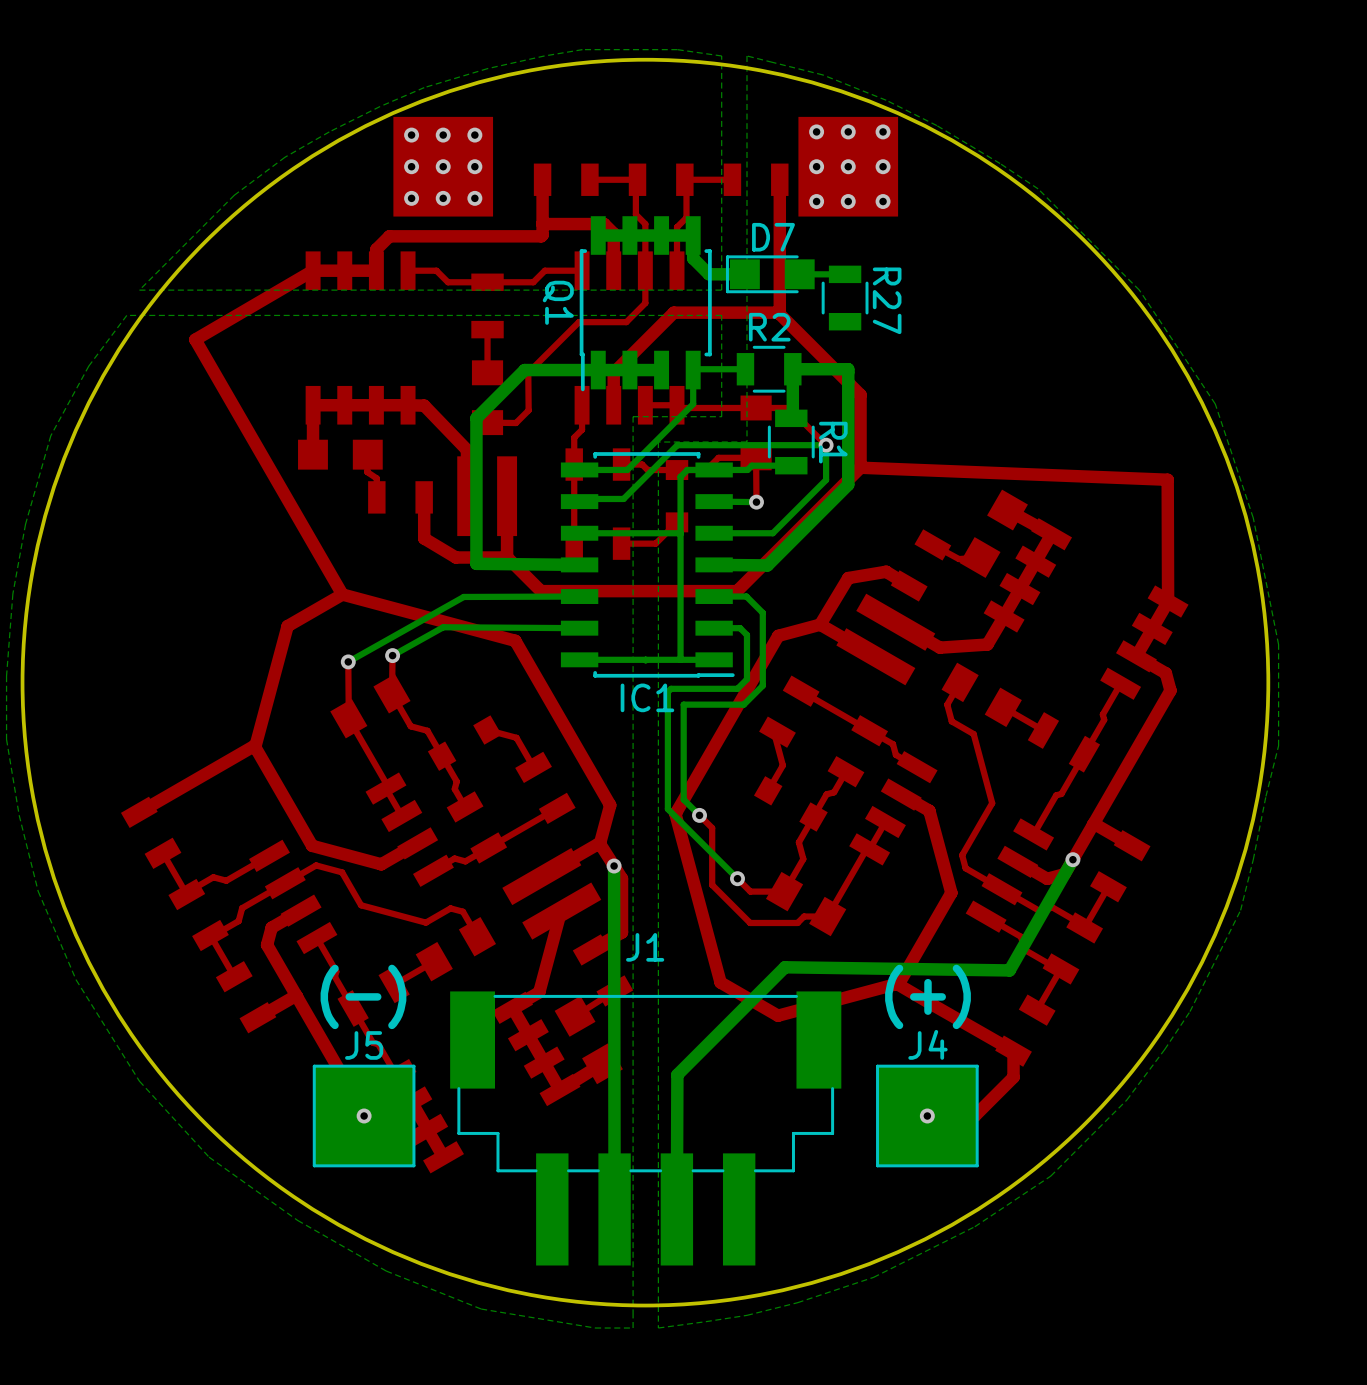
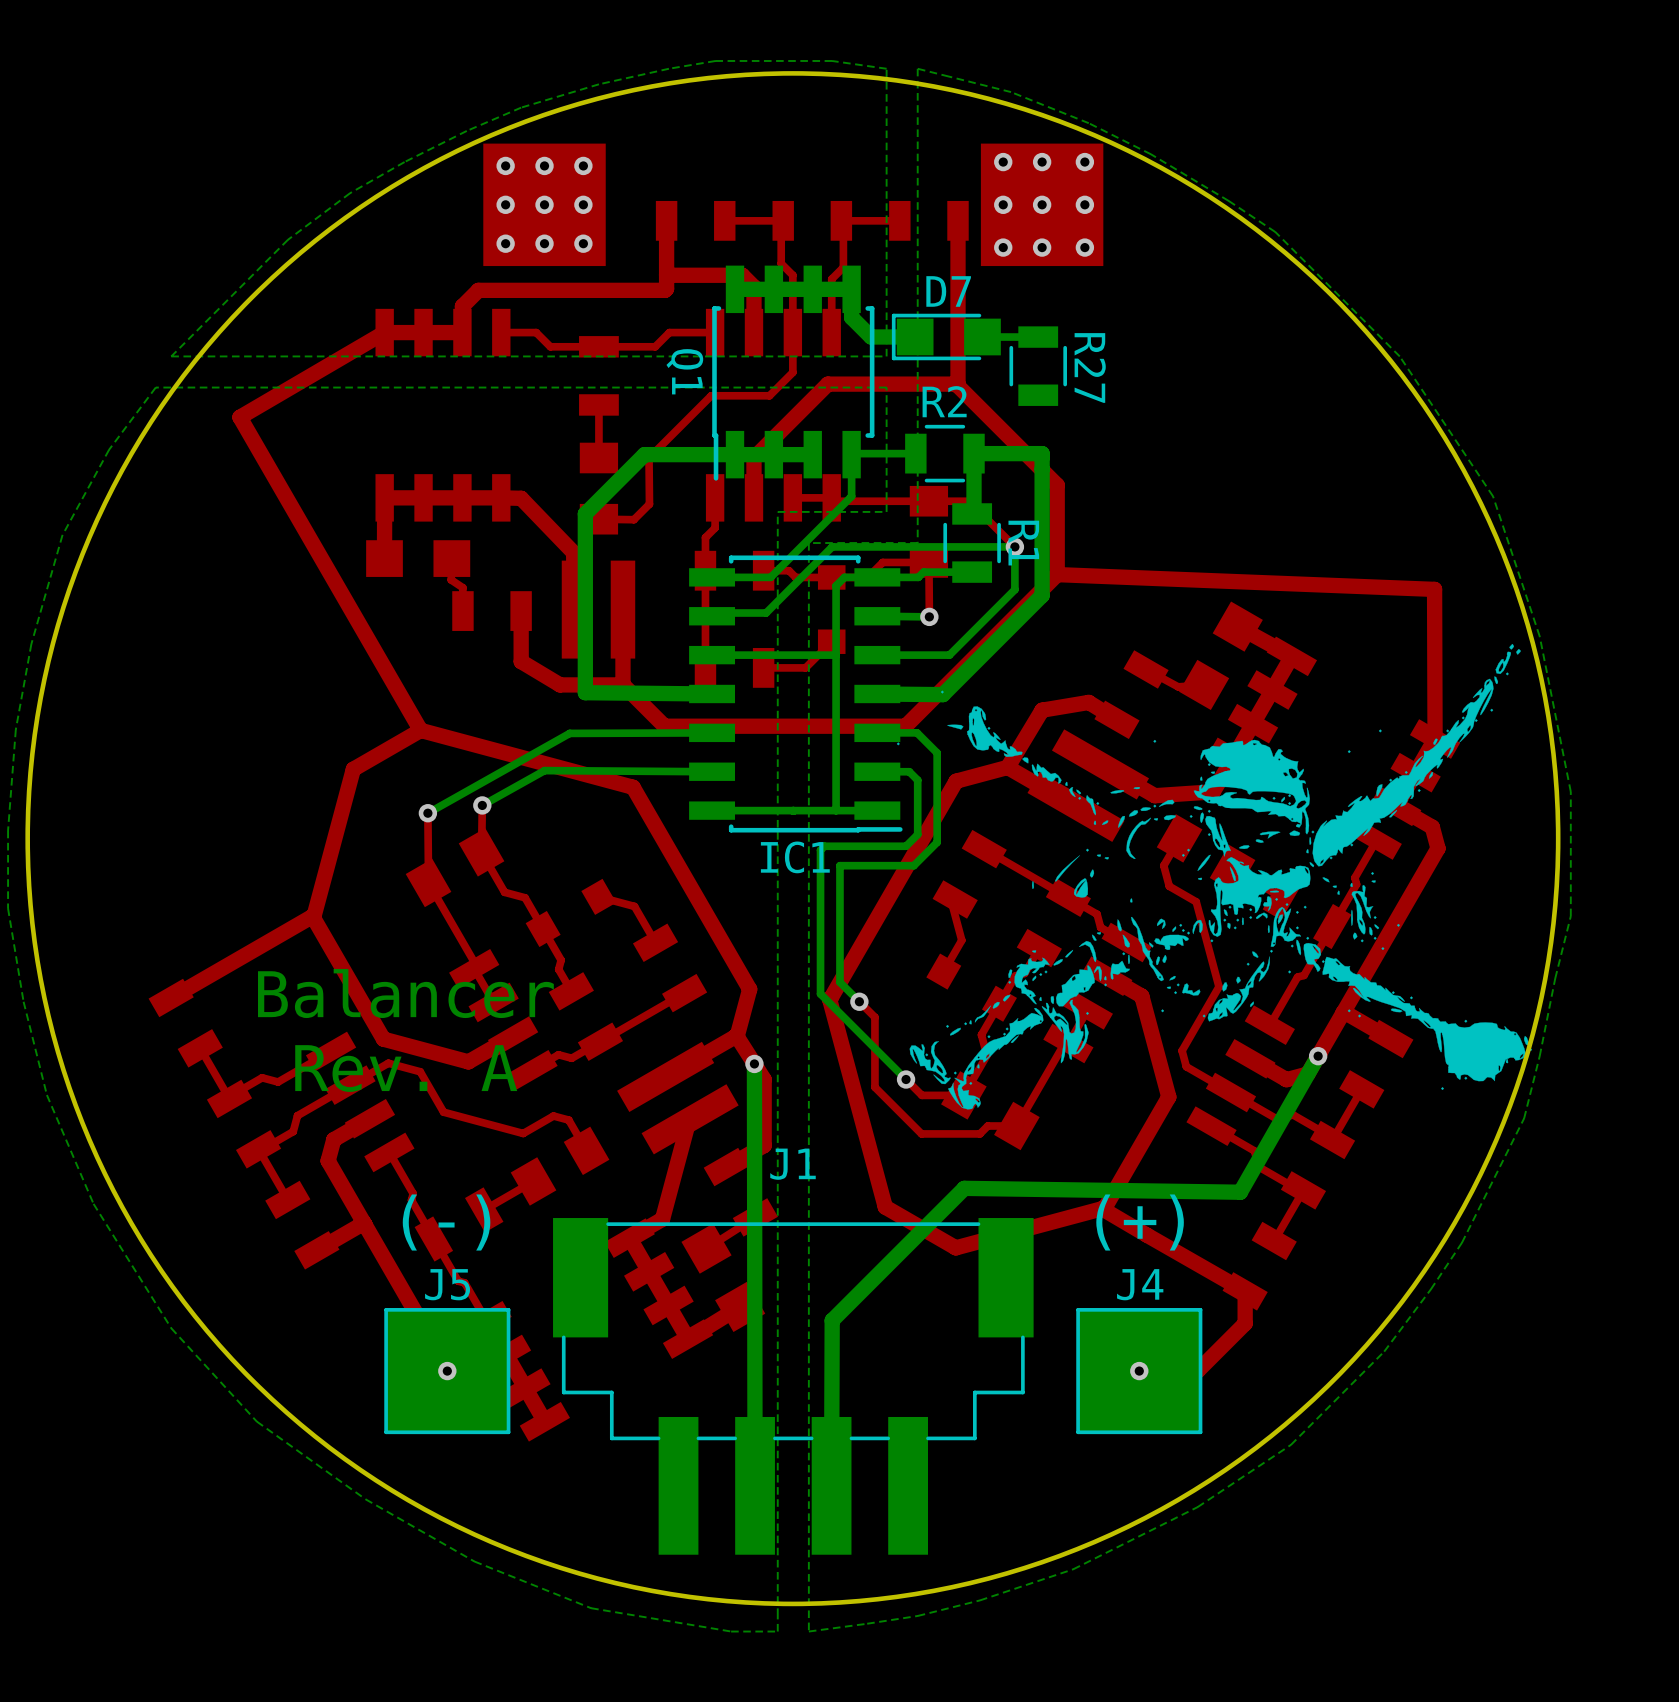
drawing: none -> [896, 643, 1533, 1110]
text: none -> Balancer (405, 993)
text: none -> Rev. A (406, 1068)

